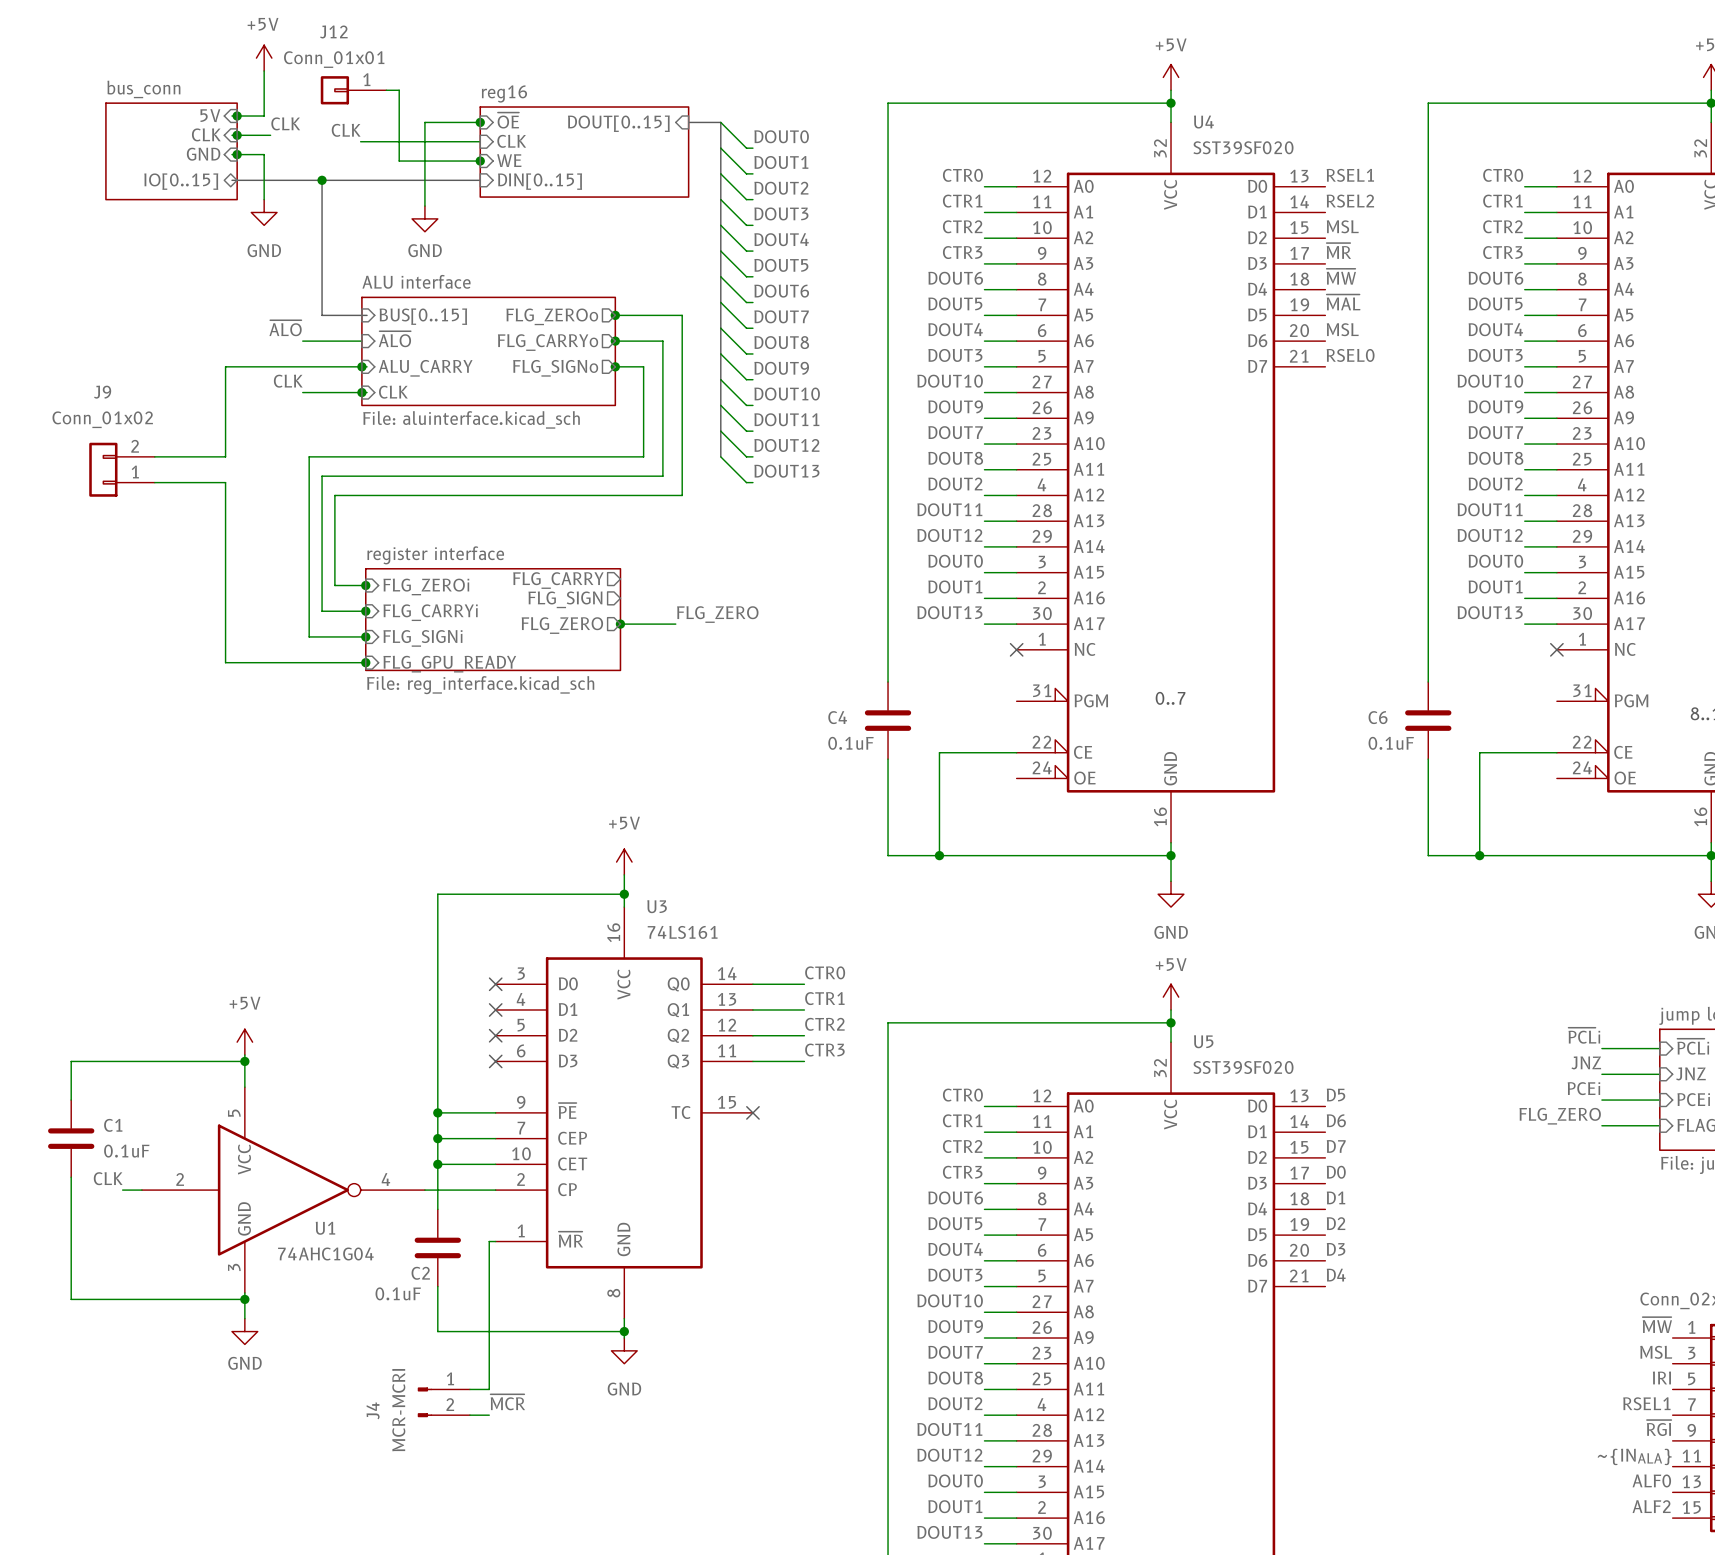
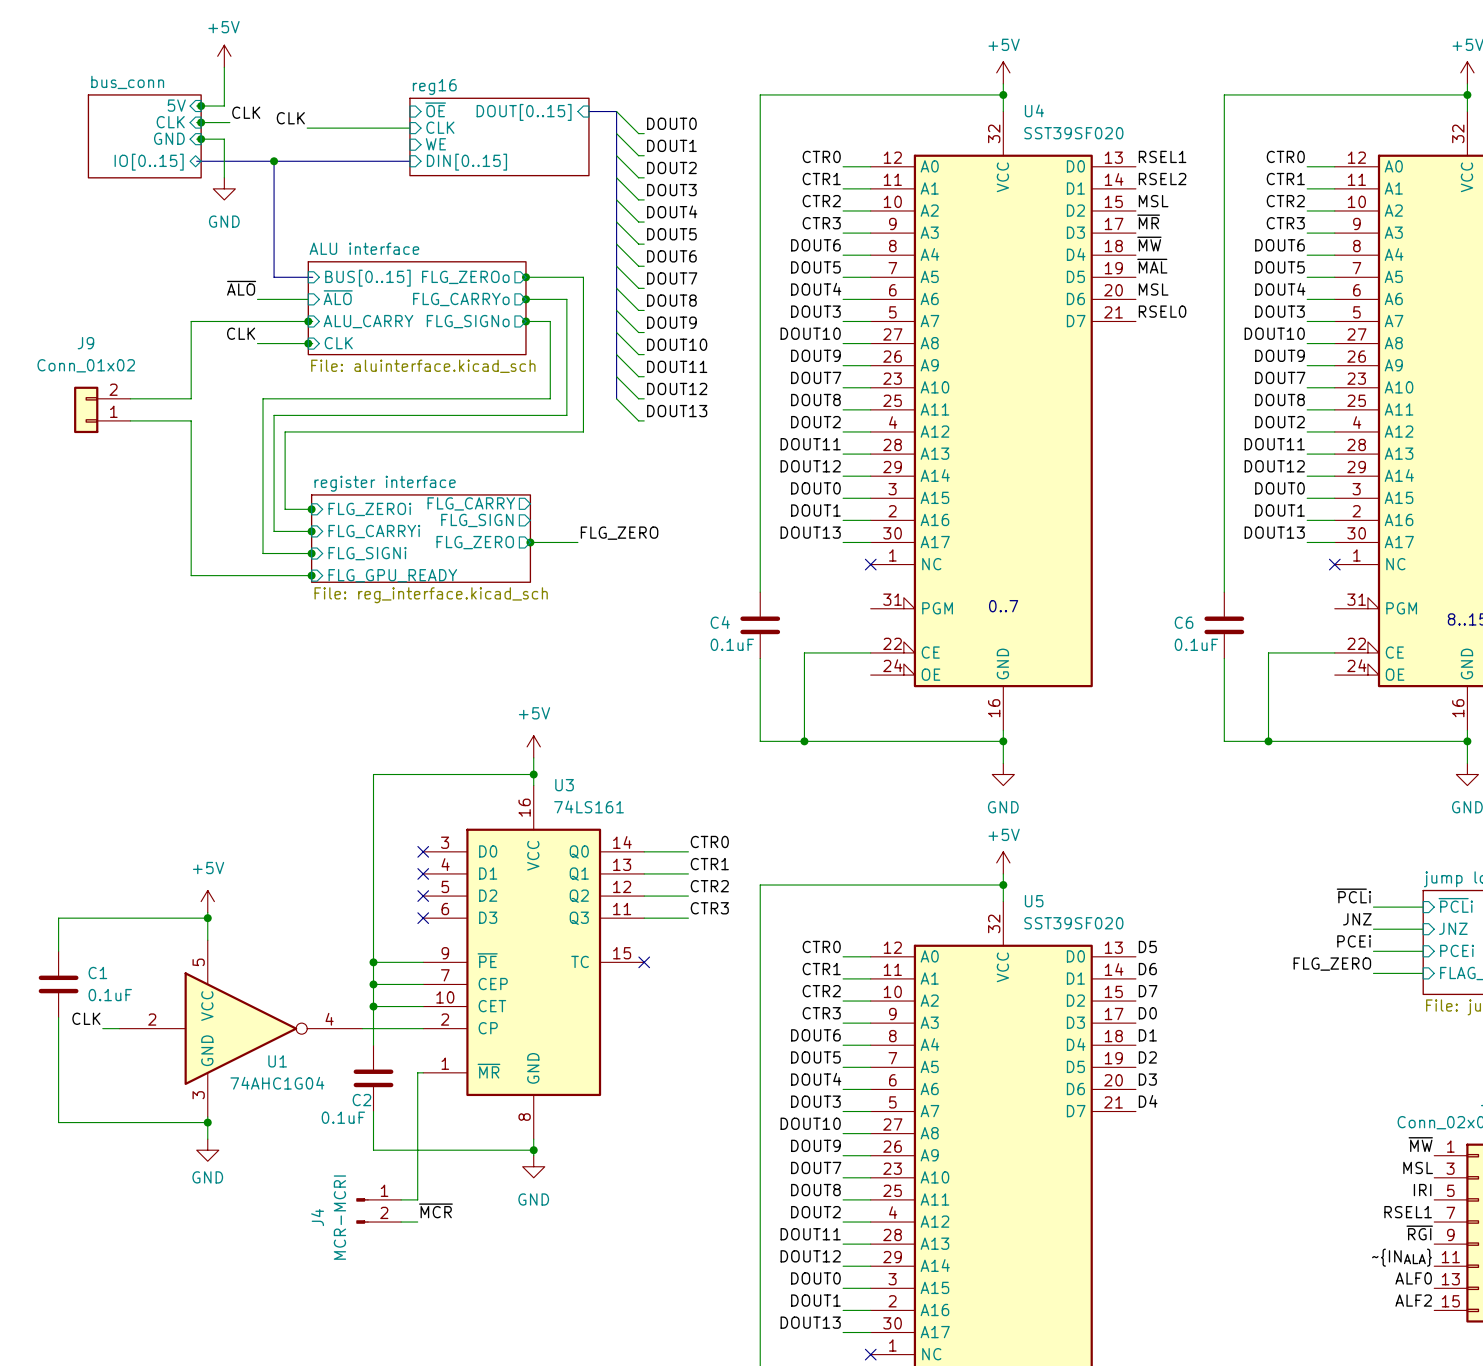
J12: Conn_01x01 (353, 90) -> none
wire: (386, 90) (399, 90) (399, 161) (482, 161) -> none
junction: (480, 122) -> none
wire: (482, 122) (424, 122) (424, 206) -> none
junction: (480, 161) -> none
power symbol: GND (424, 218) -> none

